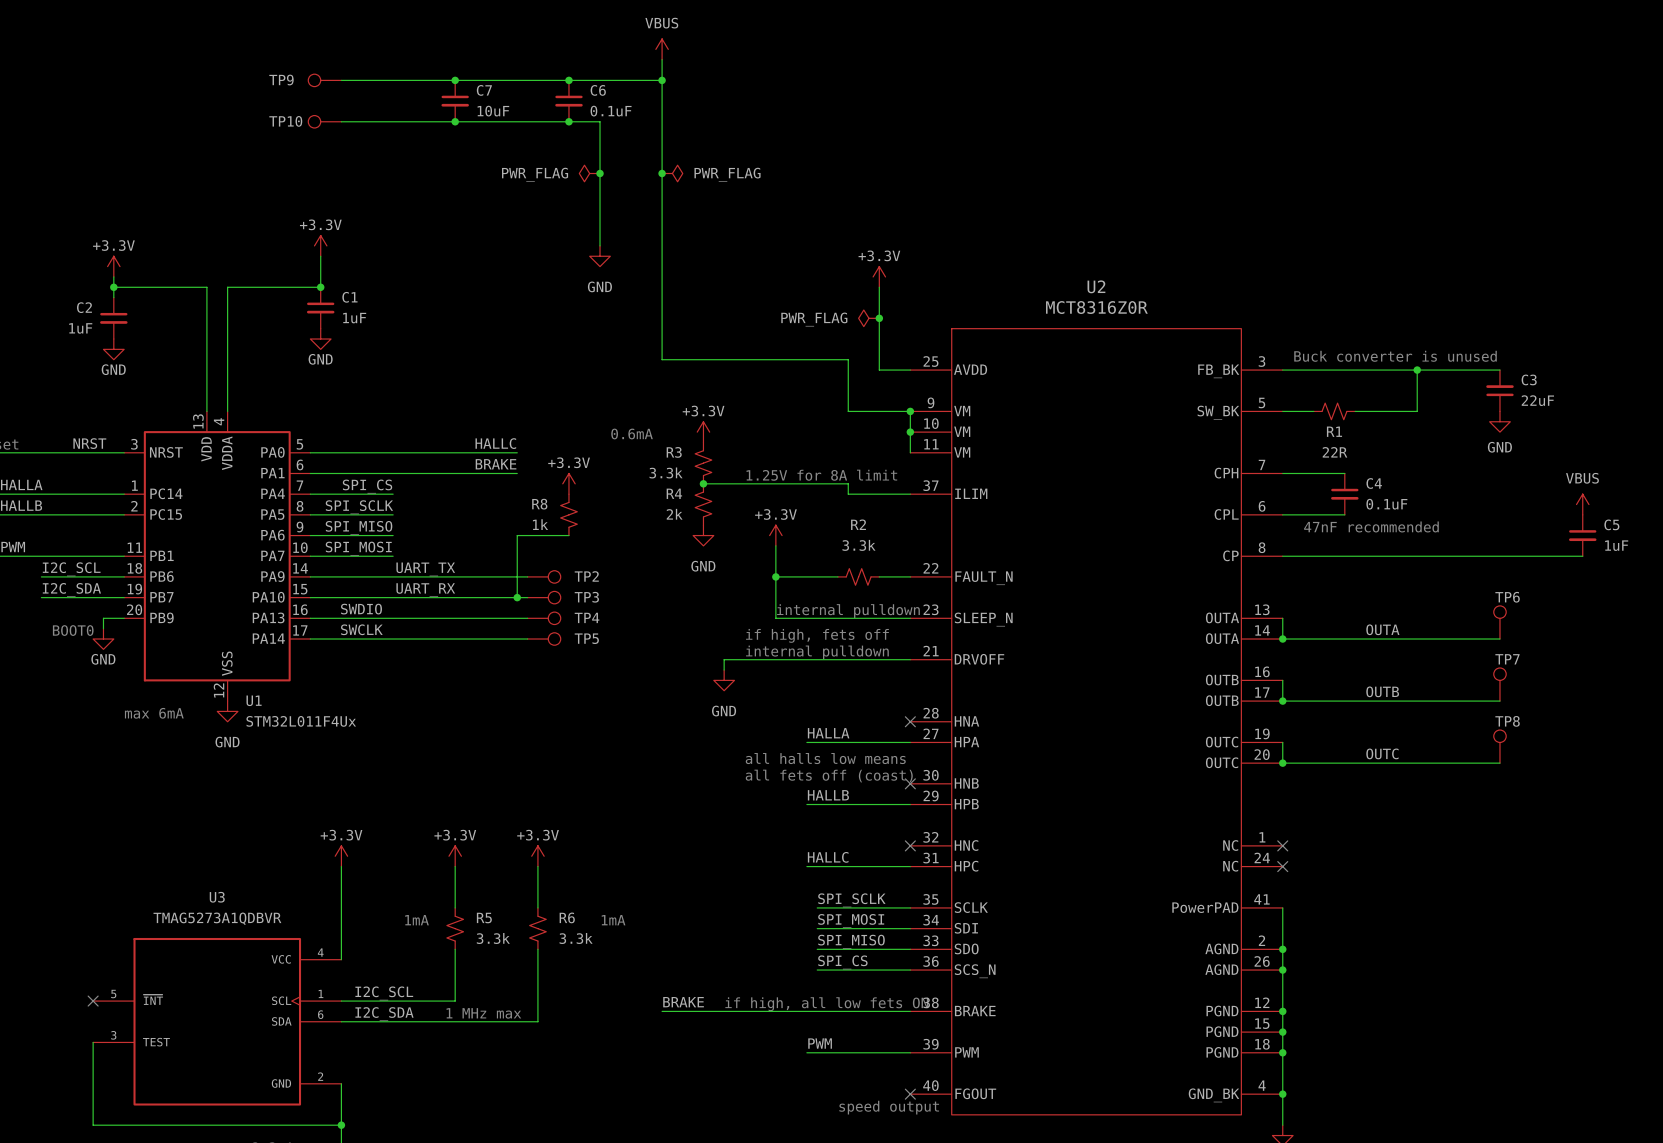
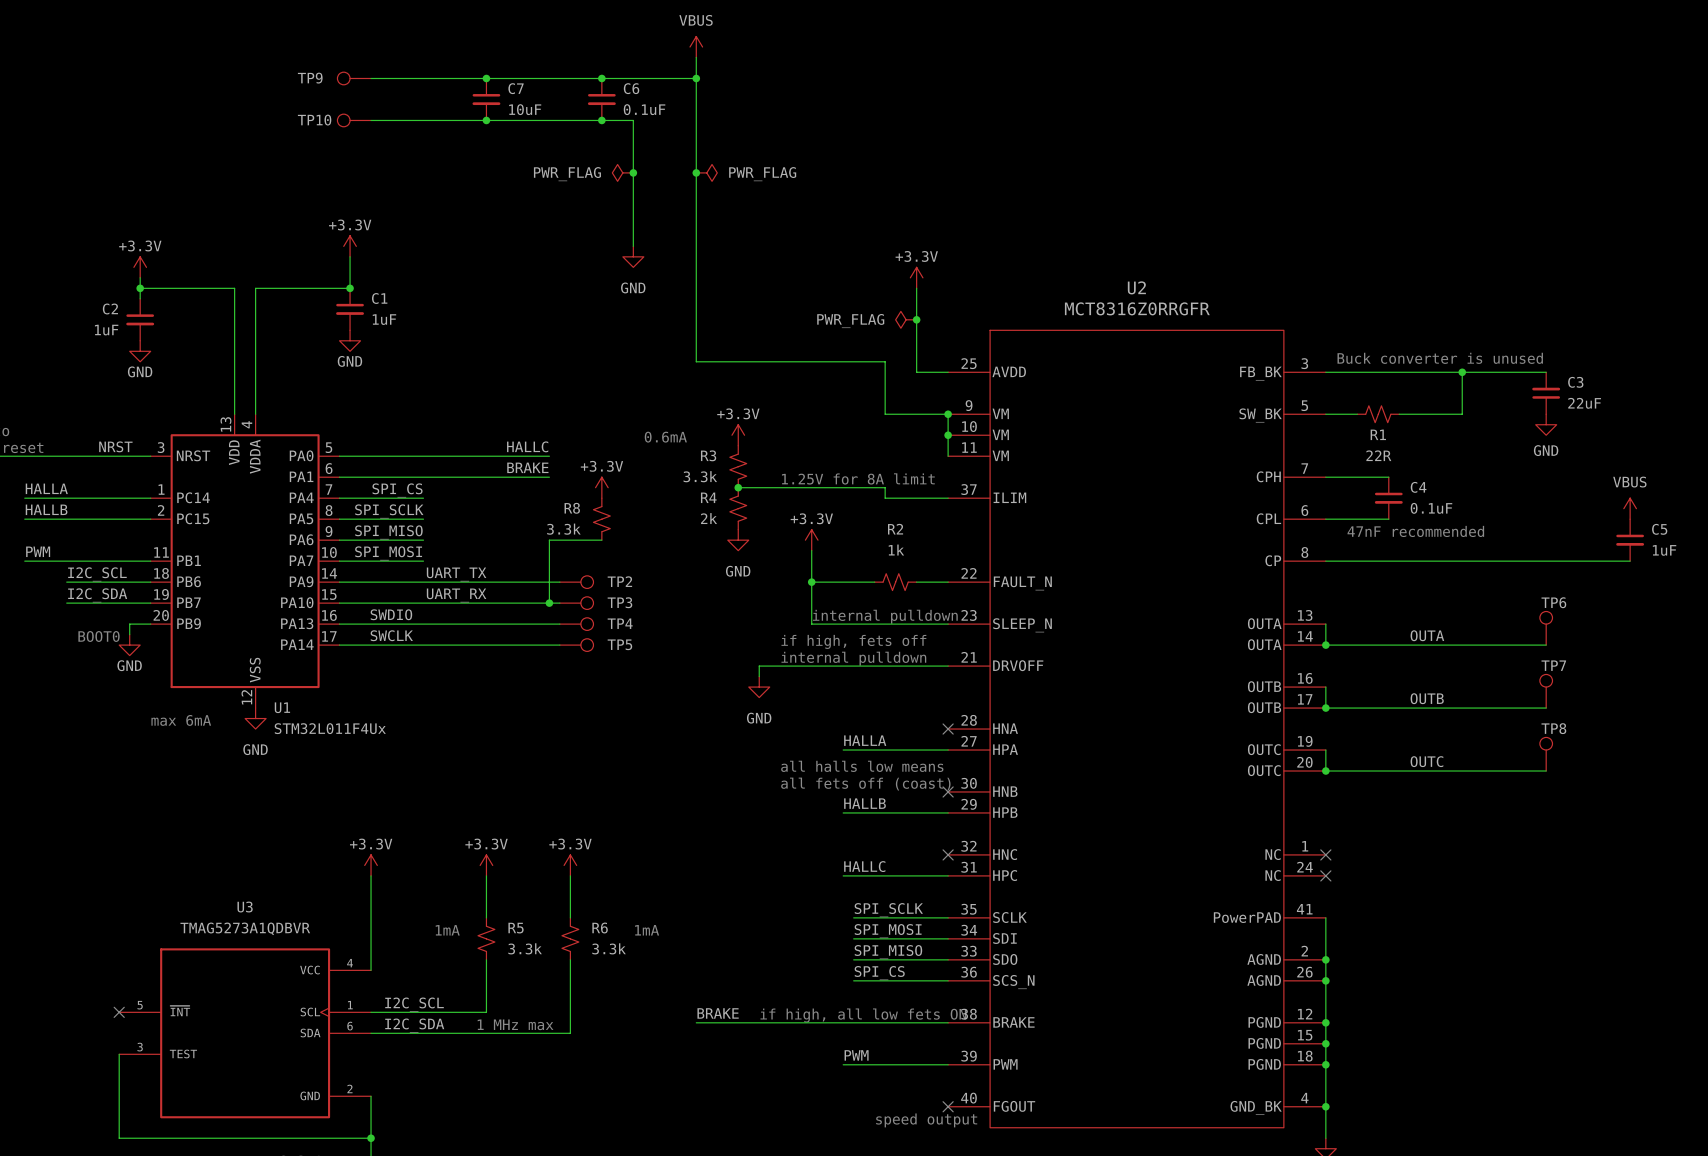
U2 value: MCT8316Z0R (1096, 307) -> MCT8316Z0RRGFR (1137, 308)
R8 value: 1k (540, 524) -> 3.3k (563, 529)
R2 value: 3.3k (858, 545) -> 1k (896, 550)

